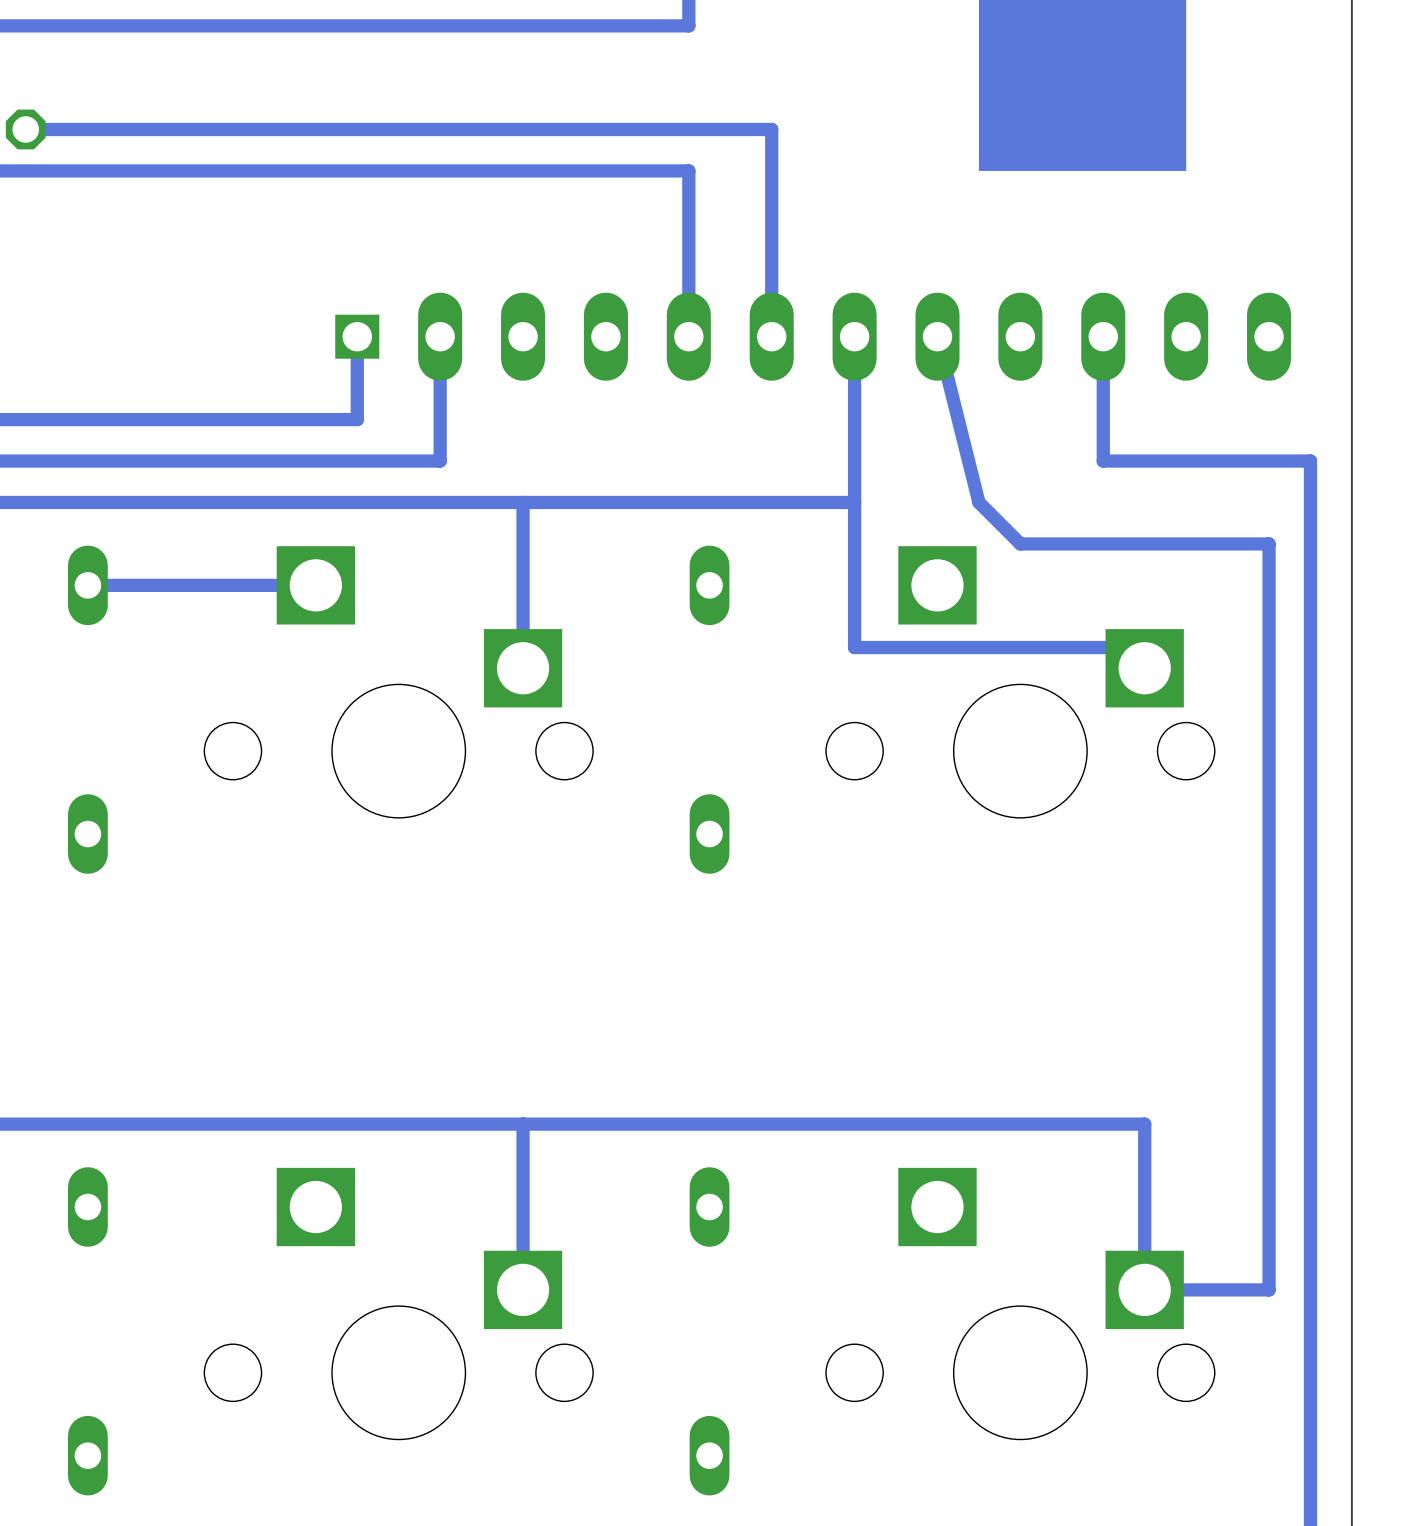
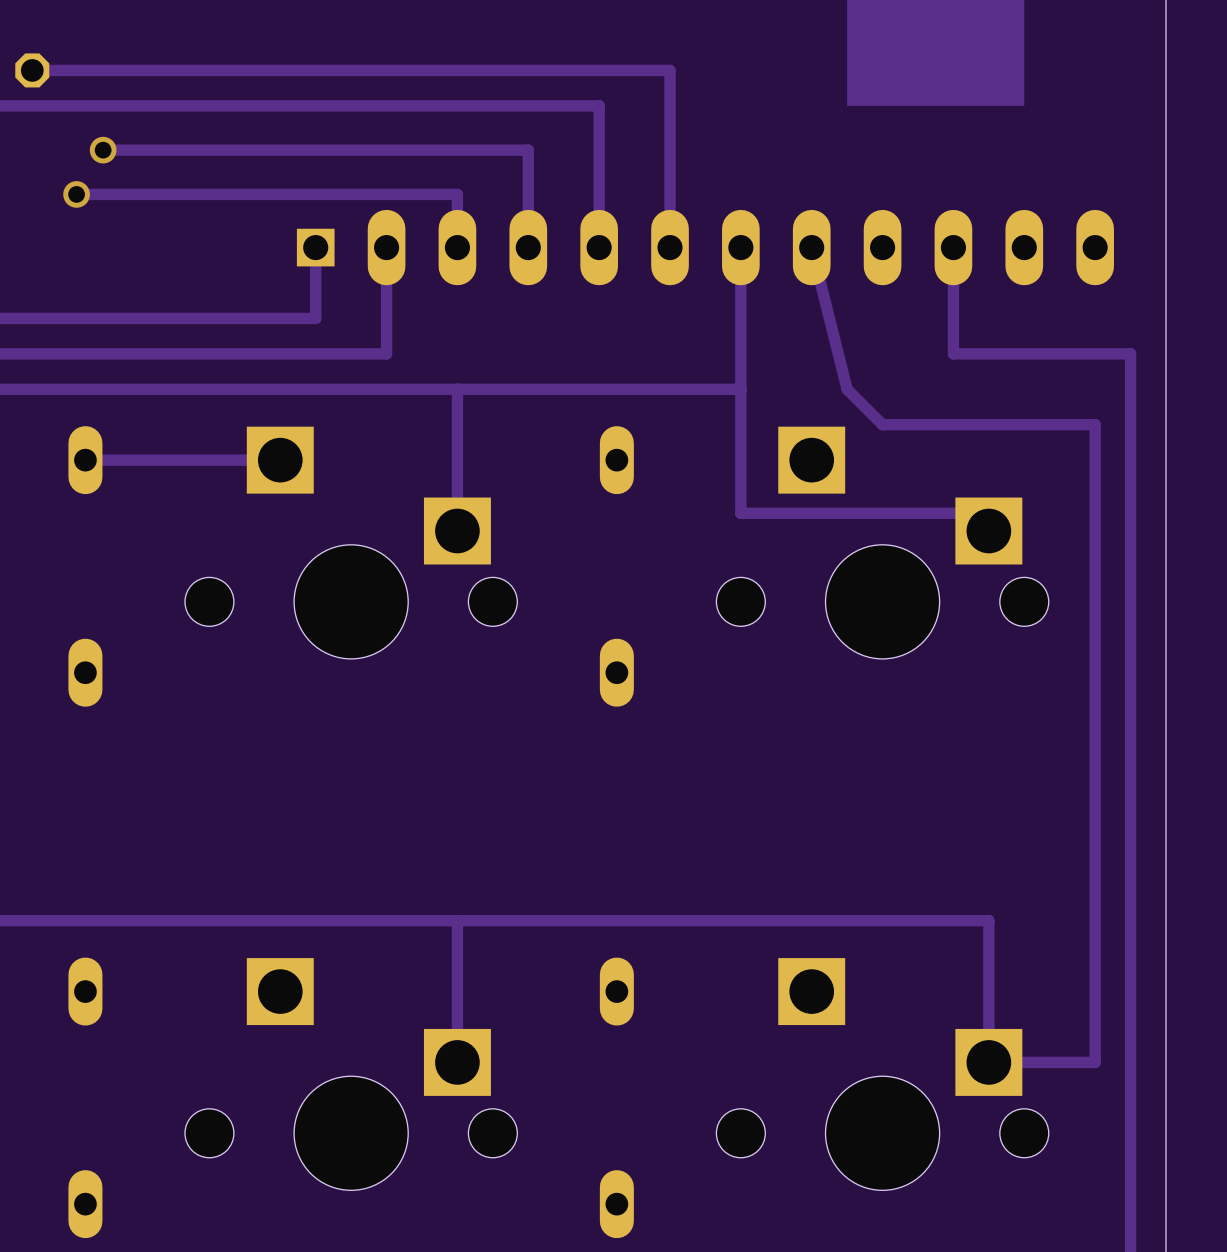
track: none -> (103, 150) (528, 150) (528, 247)
via: none -> (103, 150)
track: none -> (76, 194) (457, 194) (457, 247)
via: none -> (76, 194)

